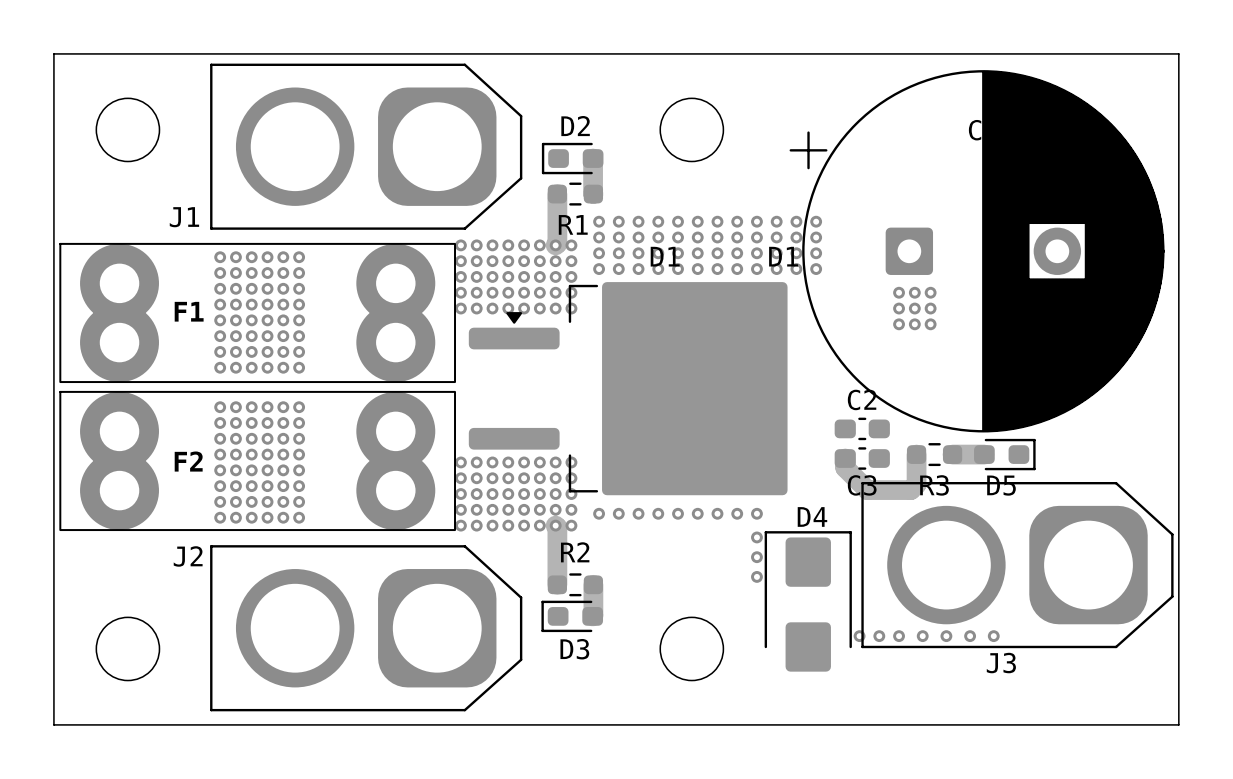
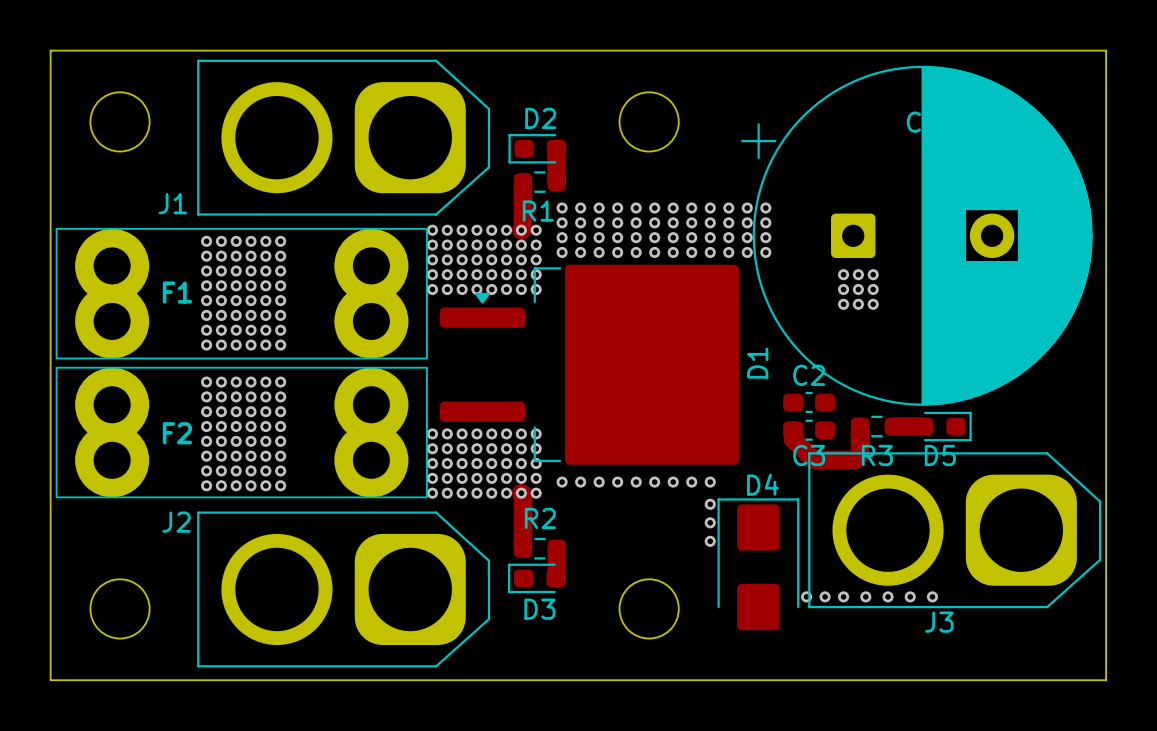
D1 name rotation: 0° (665, 256) -> 90° counterclockwise (757, 363)
D1 name position: D1 (665, 256) -> D1 (757, 363)
text: D1 (783, 256) -> none

